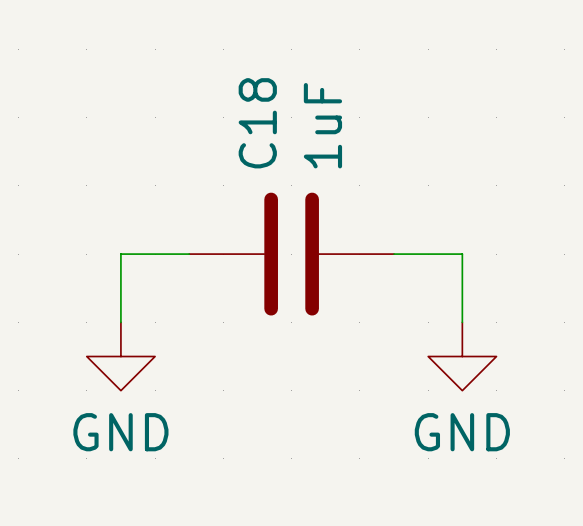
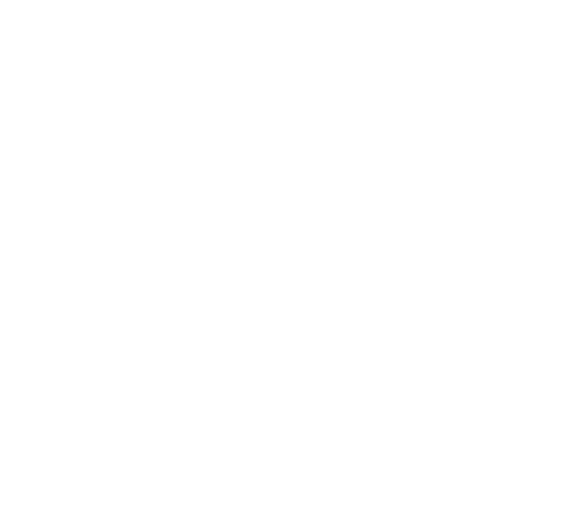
wire: (189, 254) (120, 254) (120, 322) -> none
C18: 1uF (291, 254) -> none
wire: (394, 254) (462, 254) (462, 322) -> none
power symbol: GND (120, 356) -> none
power symbol: GND (462, 356) -> none

